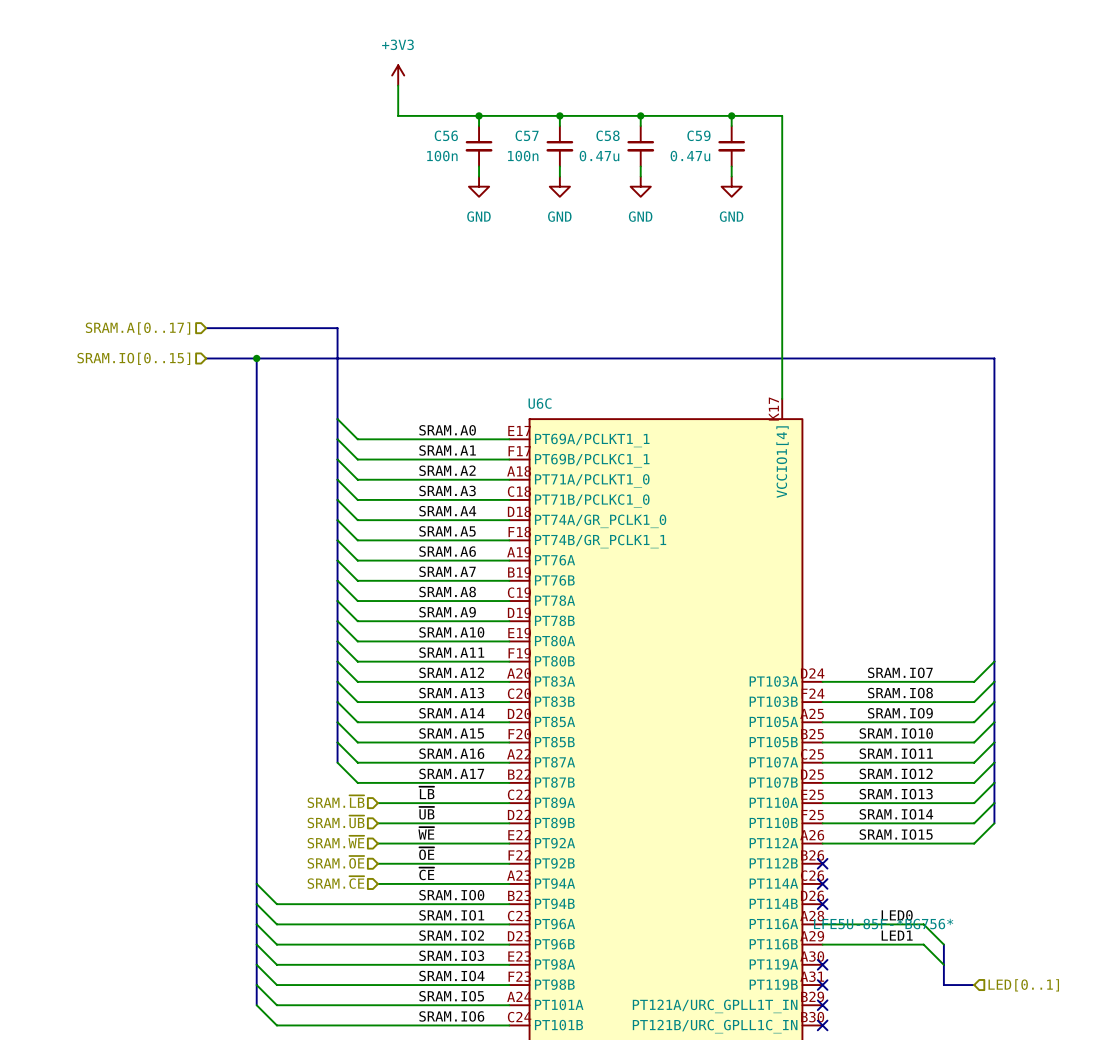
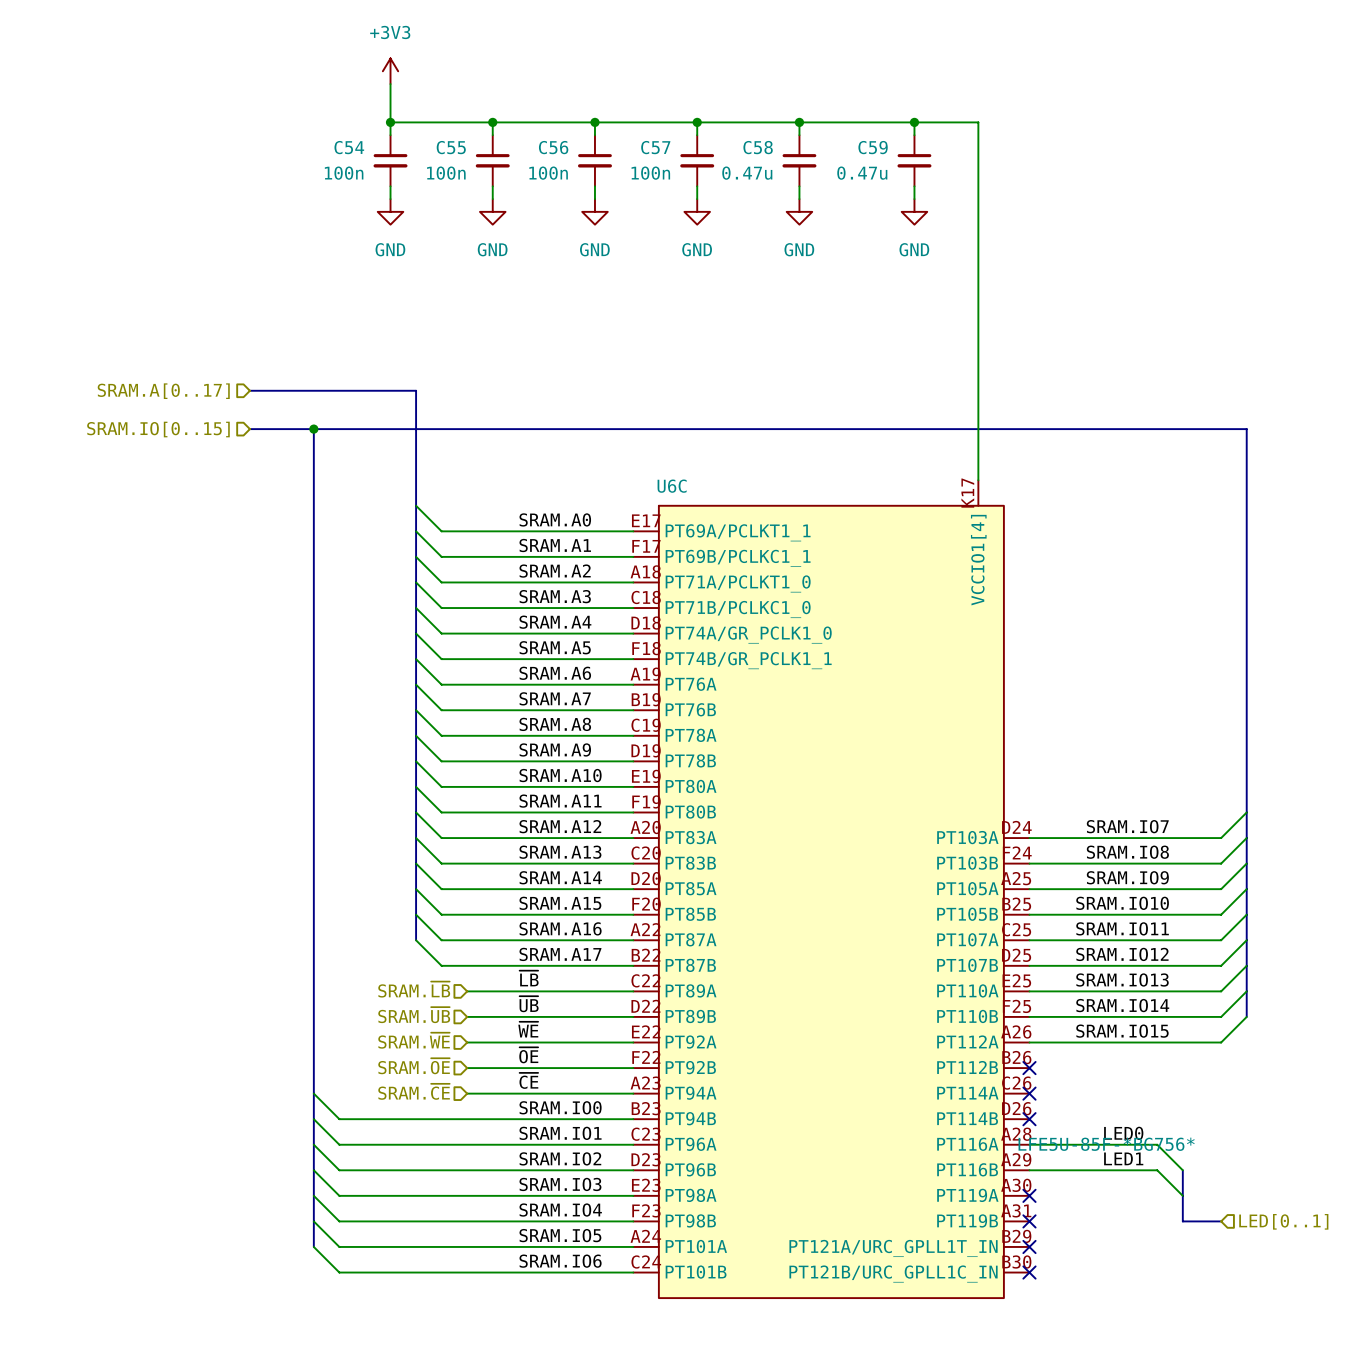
power symbol position: +3V3 (398, 75) -> +3V3 (390, 71)
wire: none -> (390, 84) (390, 135)
wire: (398, 85) (398, 115) -> none
wire: none -> (390, 122) (492, 122) (492, 135)
junction: none -> (390, 122)
junction: none -> (492, 122)
C54: none -> 100n (390, 160)
C55: none -> 100n (492, 160)
wire: none -> (390, 186) (390, 199)
wire: none -> (492, 186) (492, 199)
power symbol: none -> GND (390, 211)
power symbol: none -> GND (492, 211)

